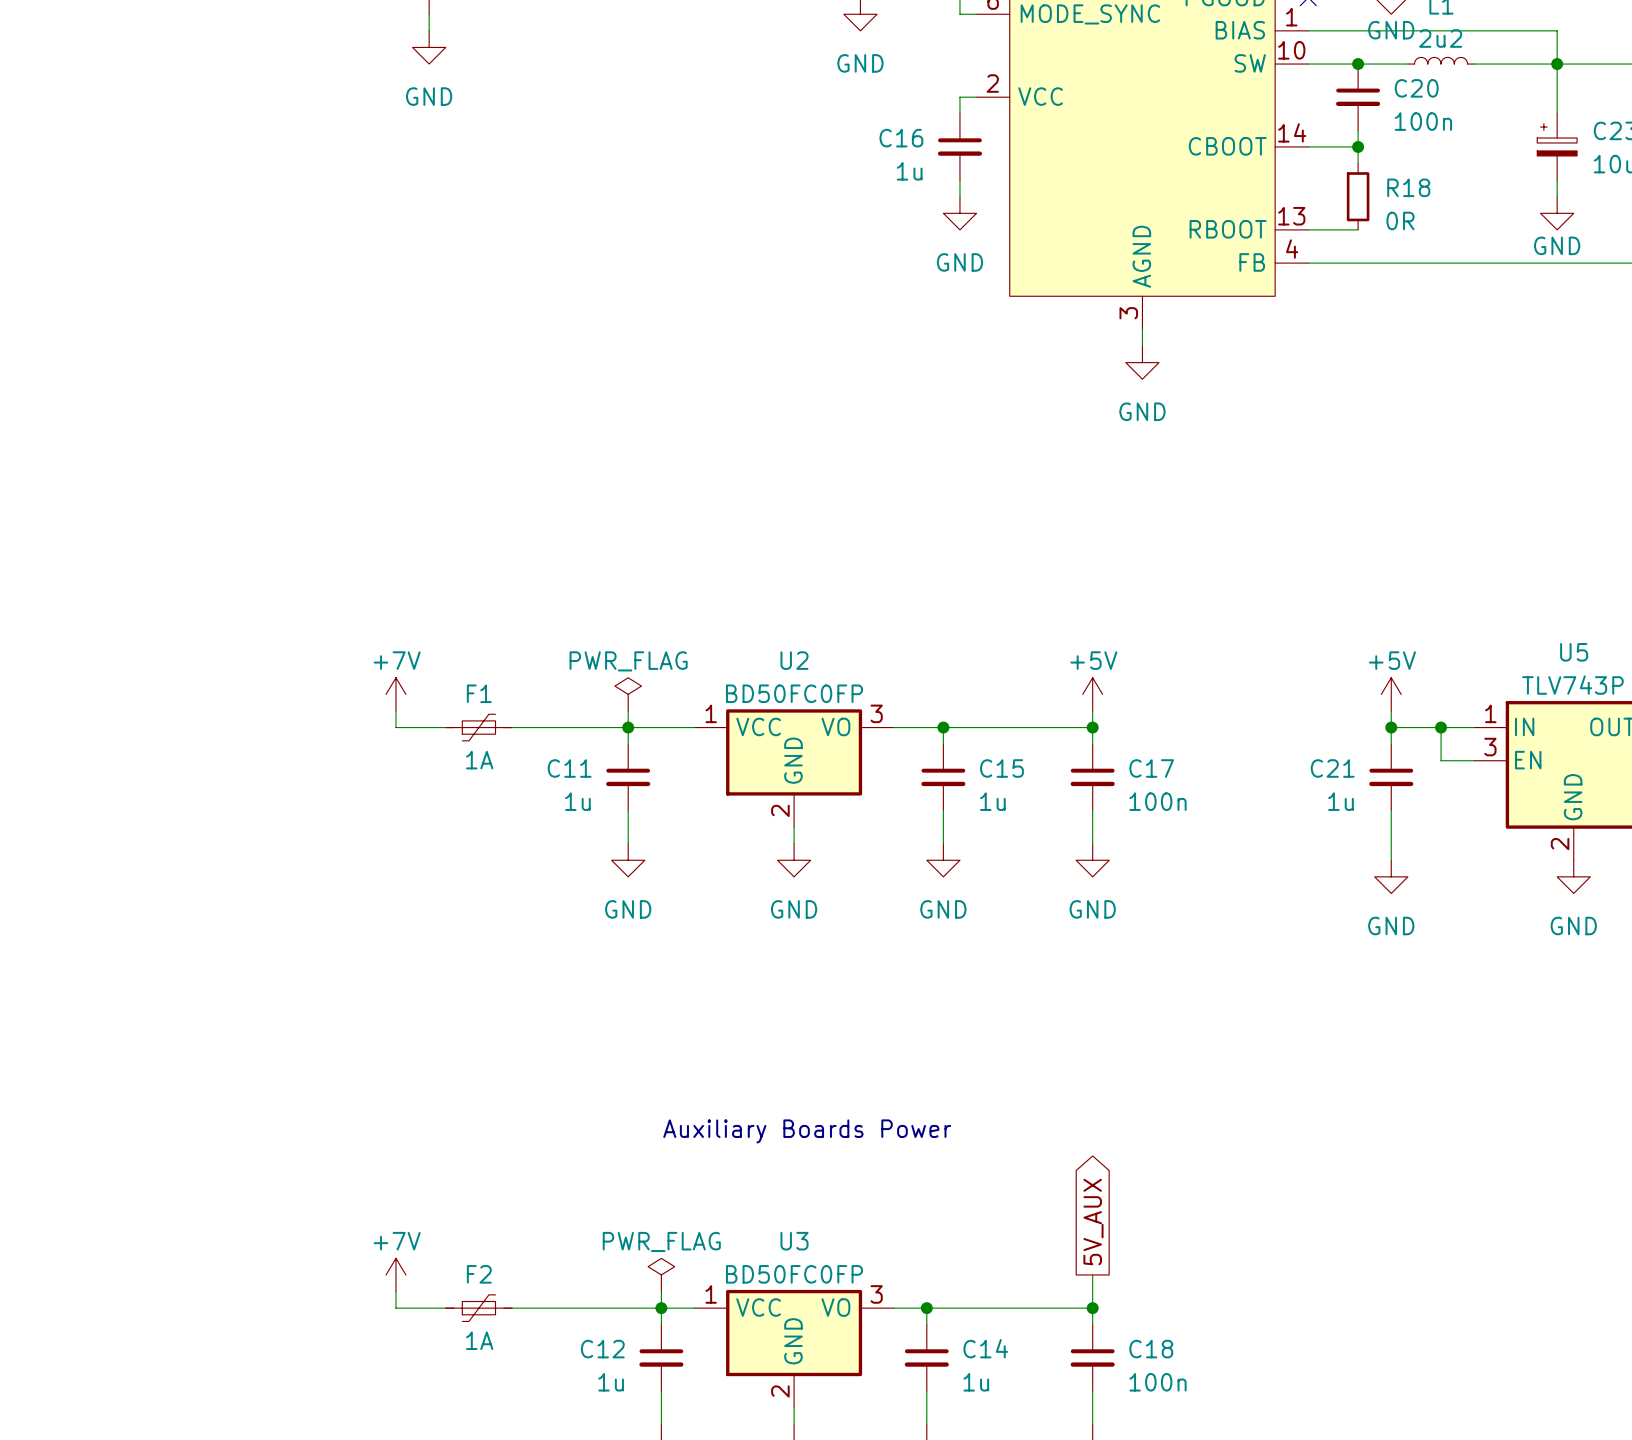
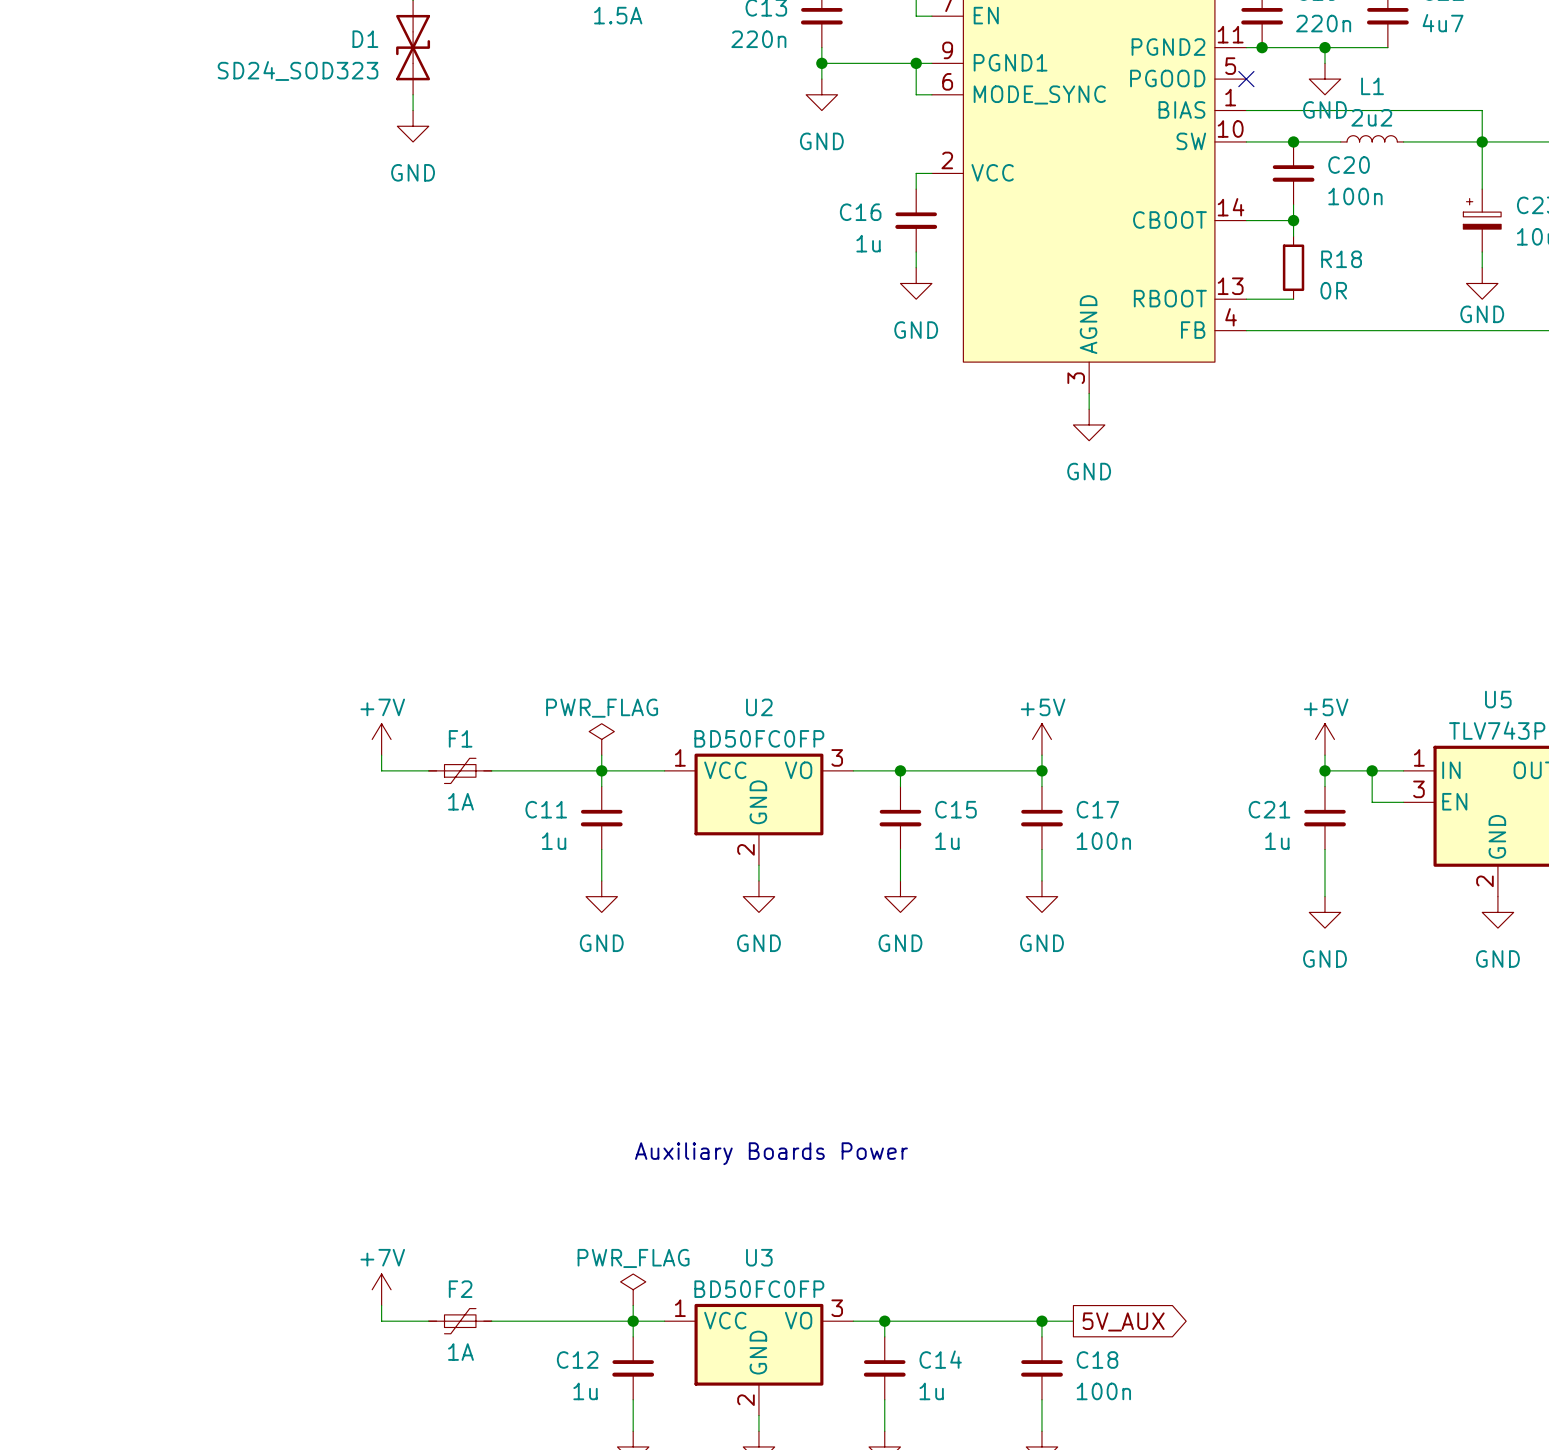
global label rotation: 0° (1093, 1222) -> 90° clockwise (1123, 1321)
global label position: 5V_AUX (1093, 1222) -> 5V_AUX (1123, 1321)
wire: (1092, 1274) (1092, 1308) -> (1073, 1321) (1041, 1321)

